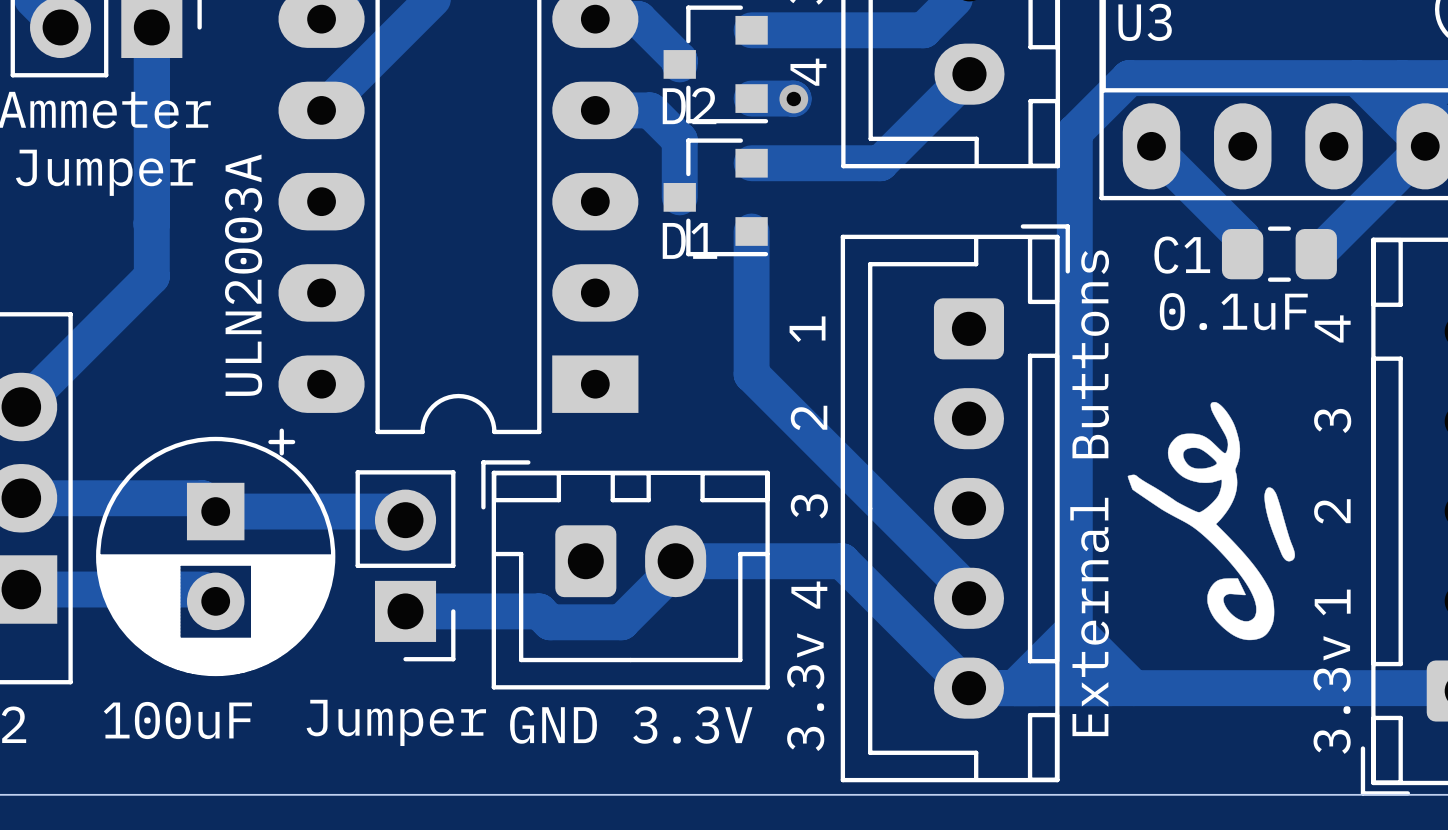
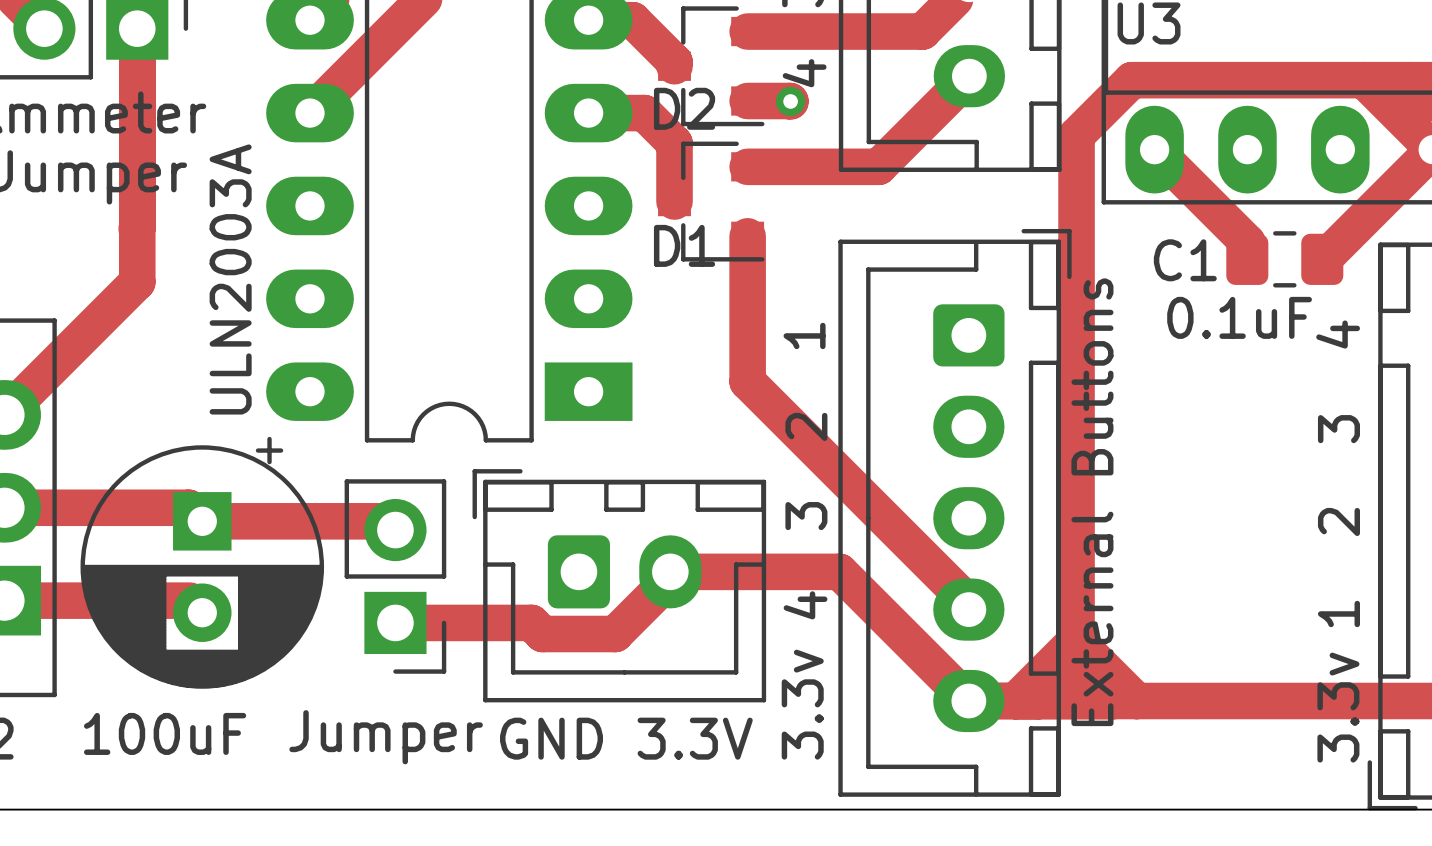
drawing: [1127, 402, 1295, 641] -> none

